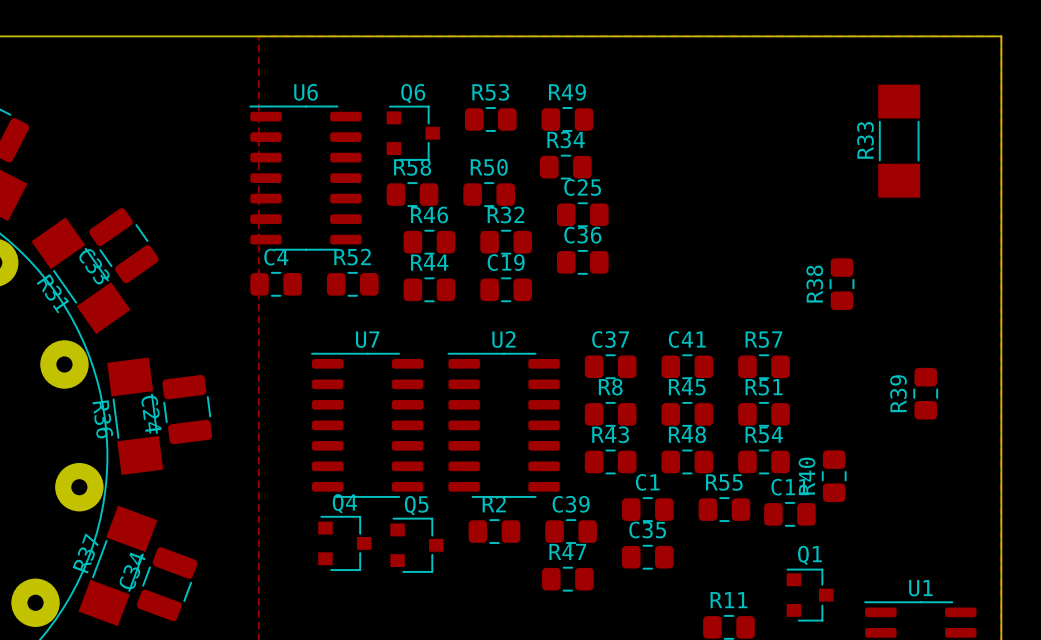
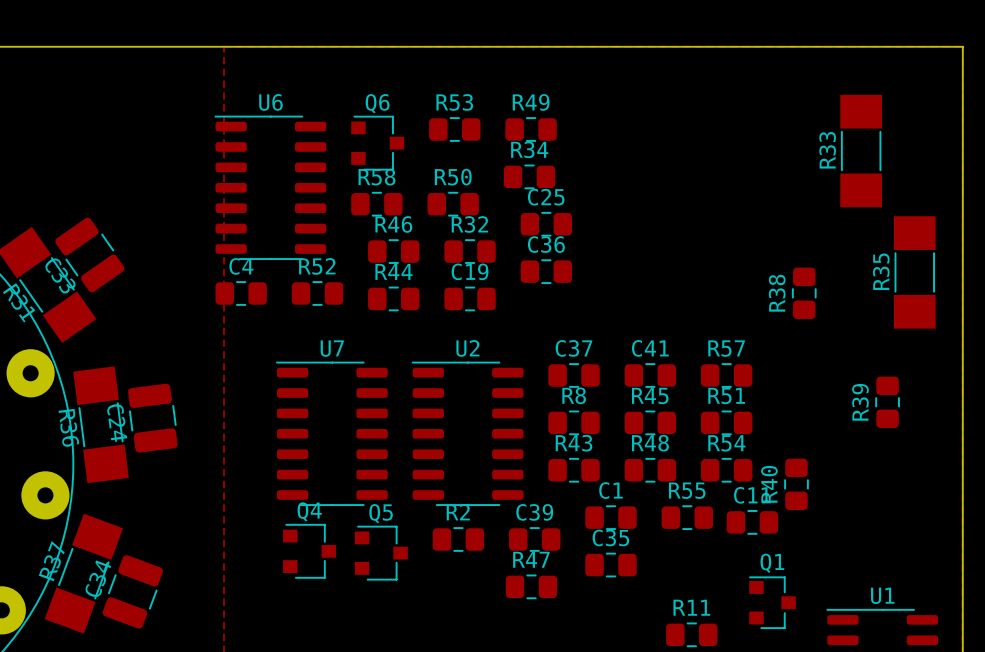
R35: none -> (914, 272)

